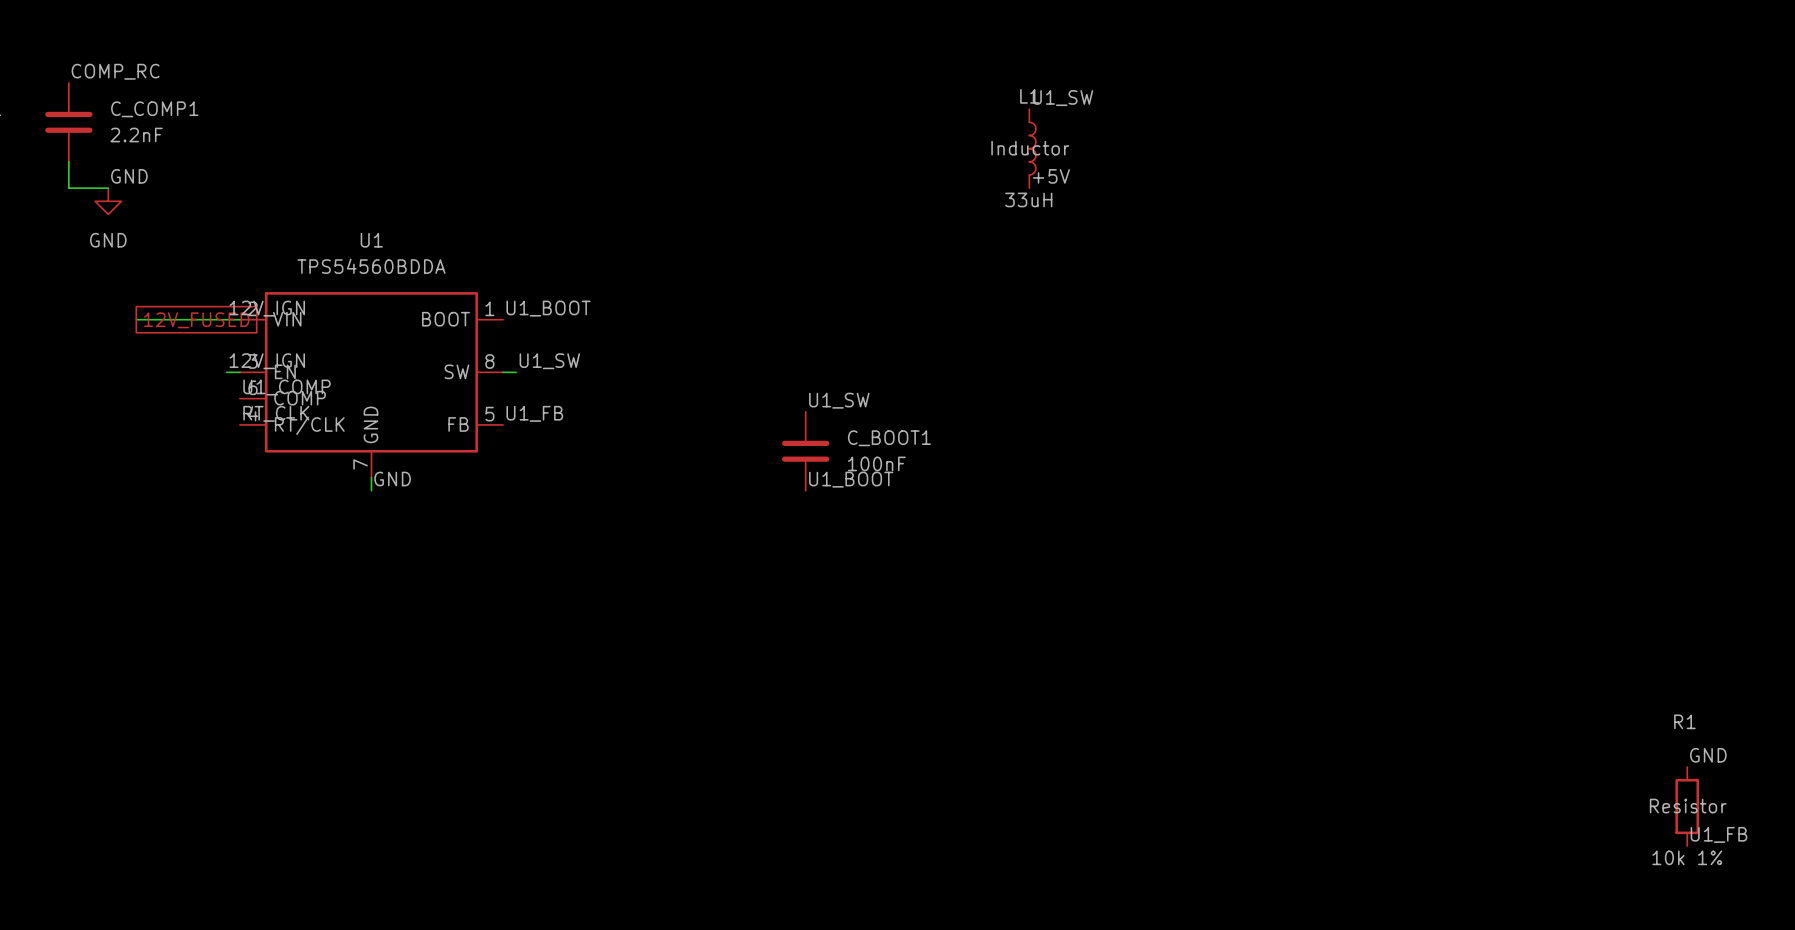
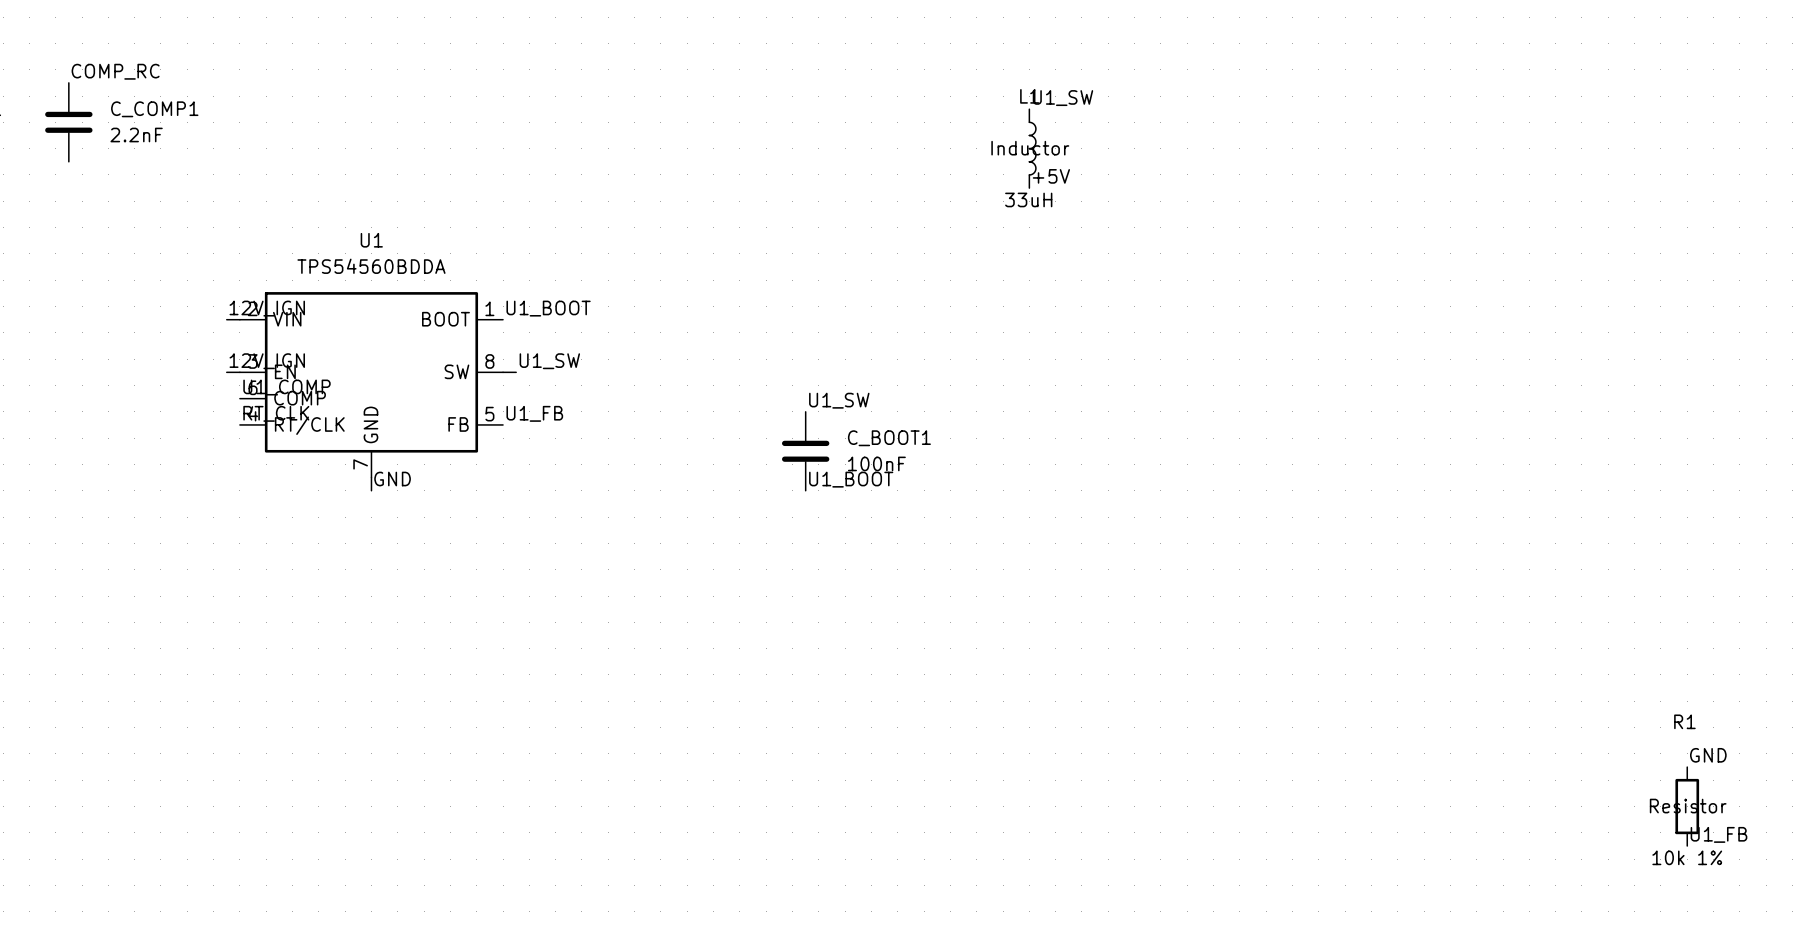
wire: (68, 161) (68, 188) (108, 188) -> none
label: GND (129, 176) -> none
power symbol: GND (108, 201) -> none
wire: (136, 319) (226, 319) -> none
global label: 12V_FUSED (196, 320) -> none

